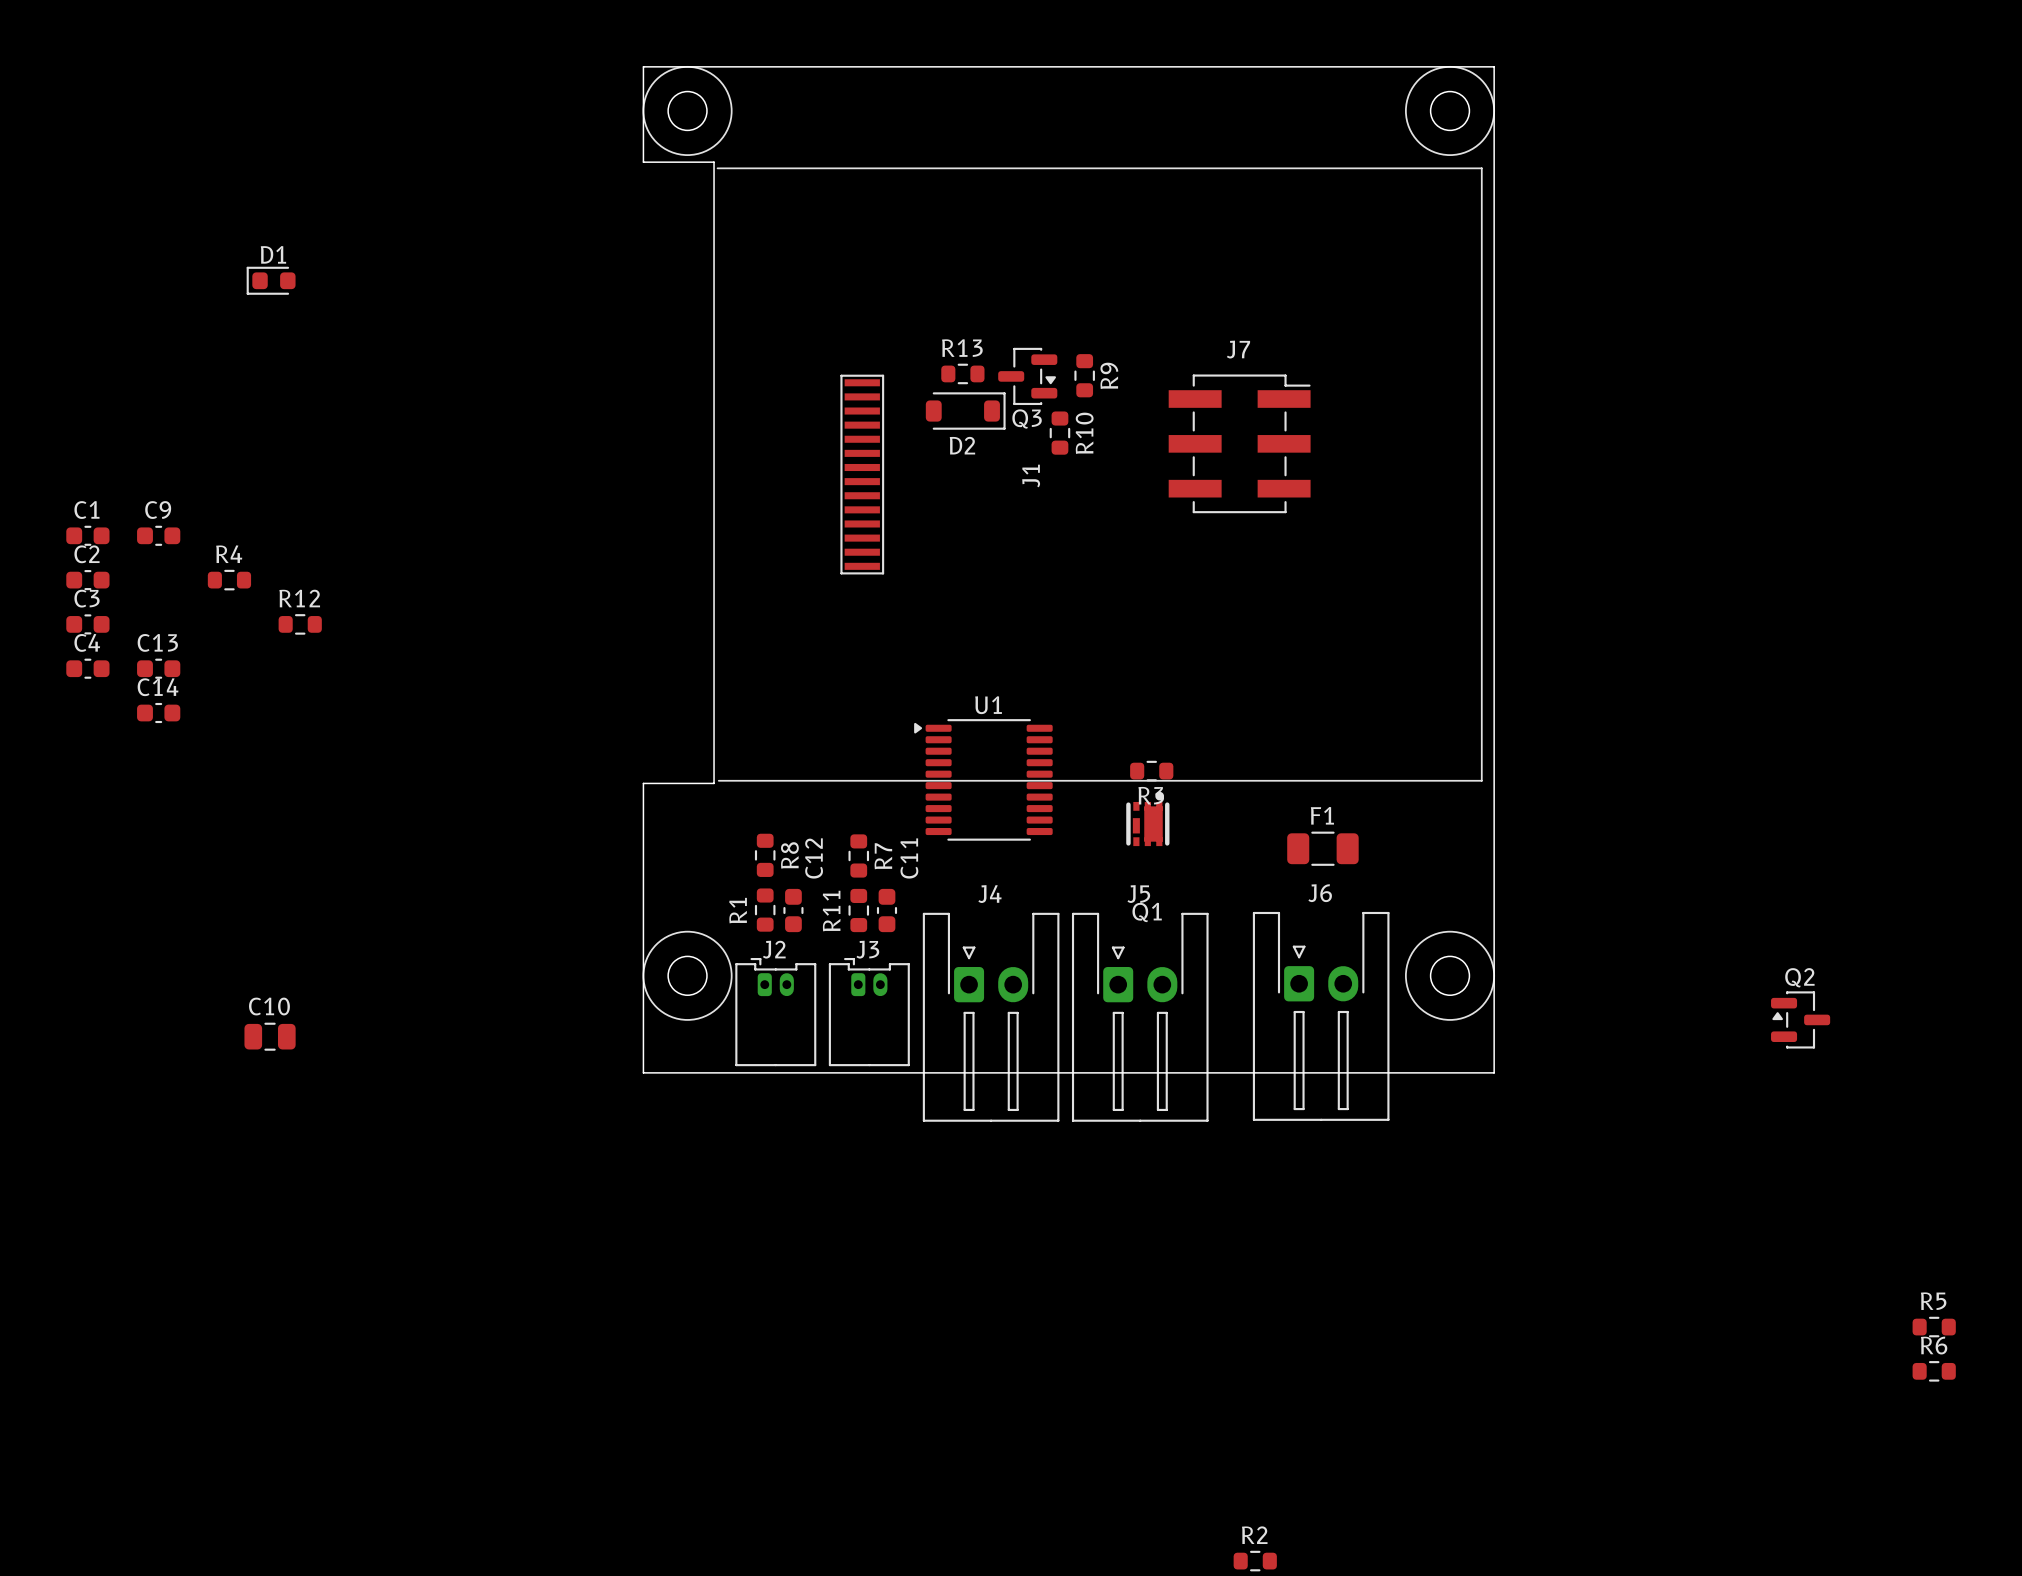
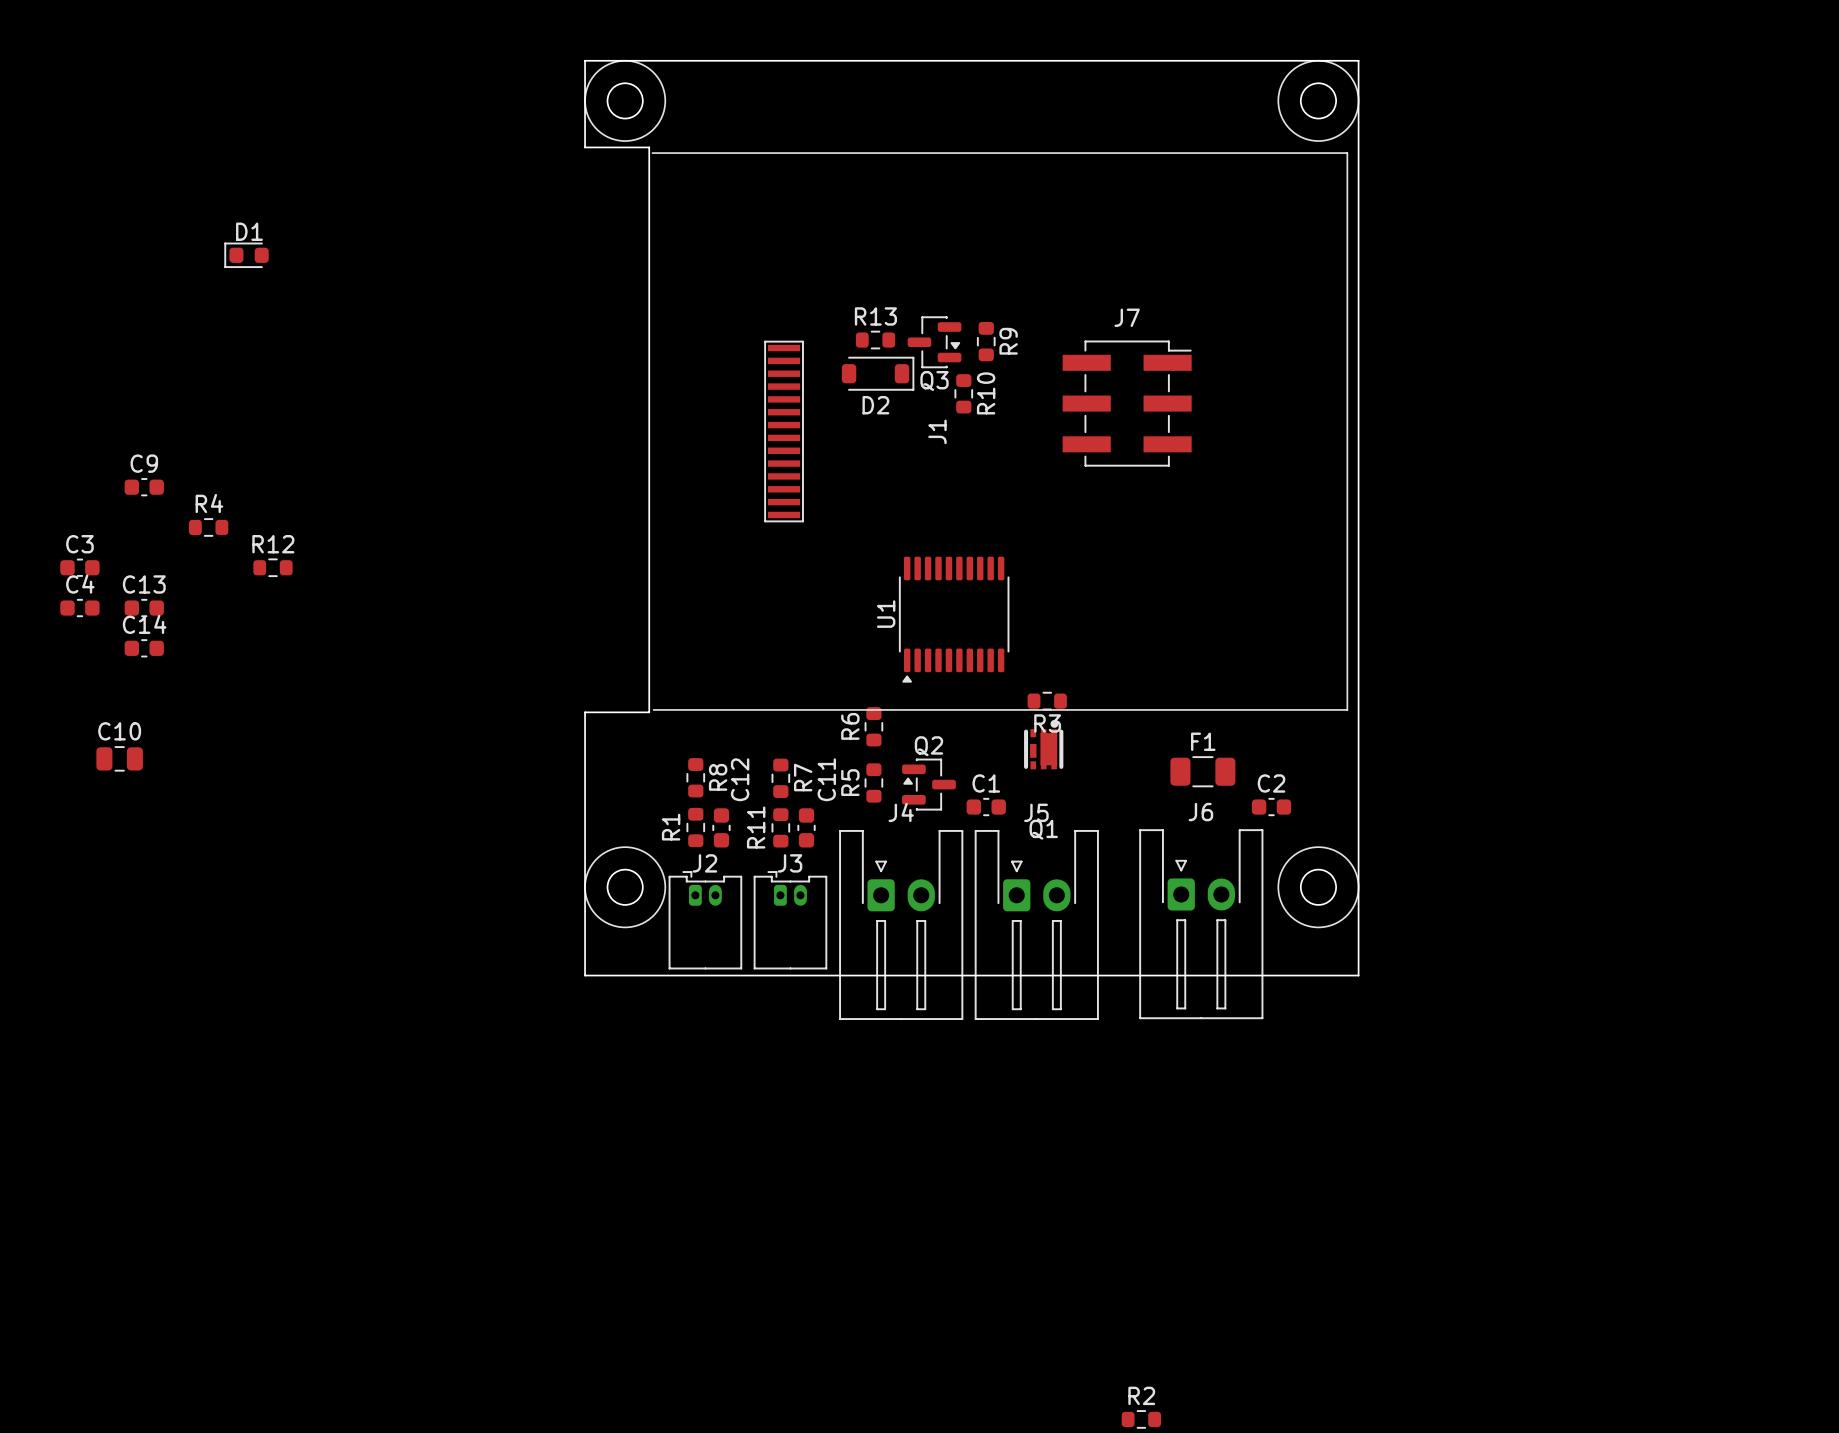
C1 position: (87, 535) -> (986, 807)
C2 position: (87, 580) -> (1271, 807)
U1 rotation: 0° (983, 779) -> 90° counterclockwise (954, 619)
U1 position: (983, 779) -> (954, 619)
Q2 position: (1800, 1019) -> (928, 784)
C10 position: (270, 1036) -> (119, 758)
R5 name position: R5 (1933, 1301) -> R5 (850, 782)
R5 rotation: 0° (1934, 1327) -> 90° clockwise (873, 782)
R5 position: (1934, 1327) -> (873, 782)
R6 name position: R6 (1934, 1345) -> R6 (850, 726)
R6 rotation: 0° (1934, 1371) -> 90° clockwise (873, 726)
R6 position: (1934, 1371) -> (873, 726)

